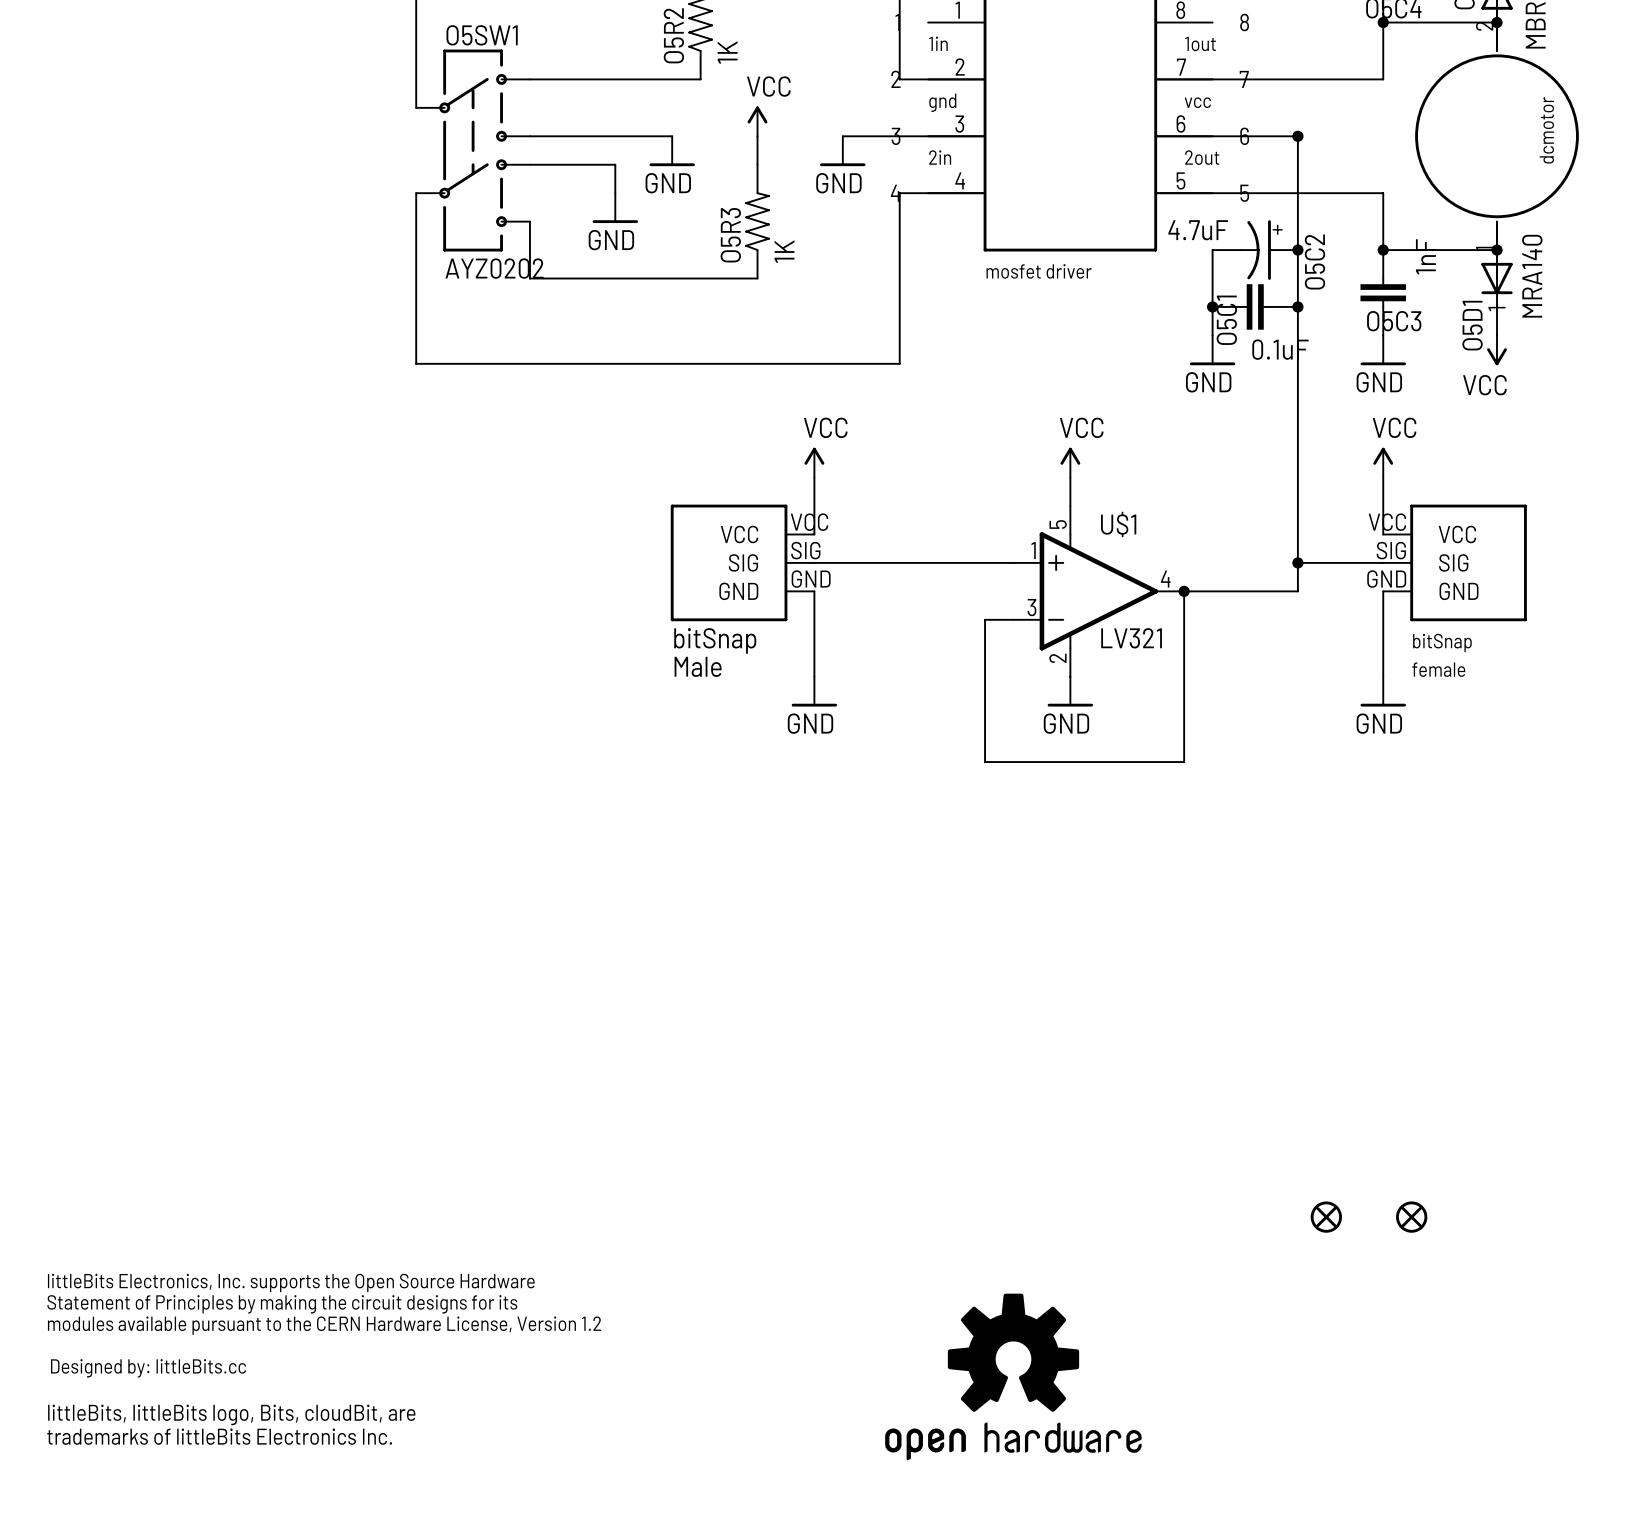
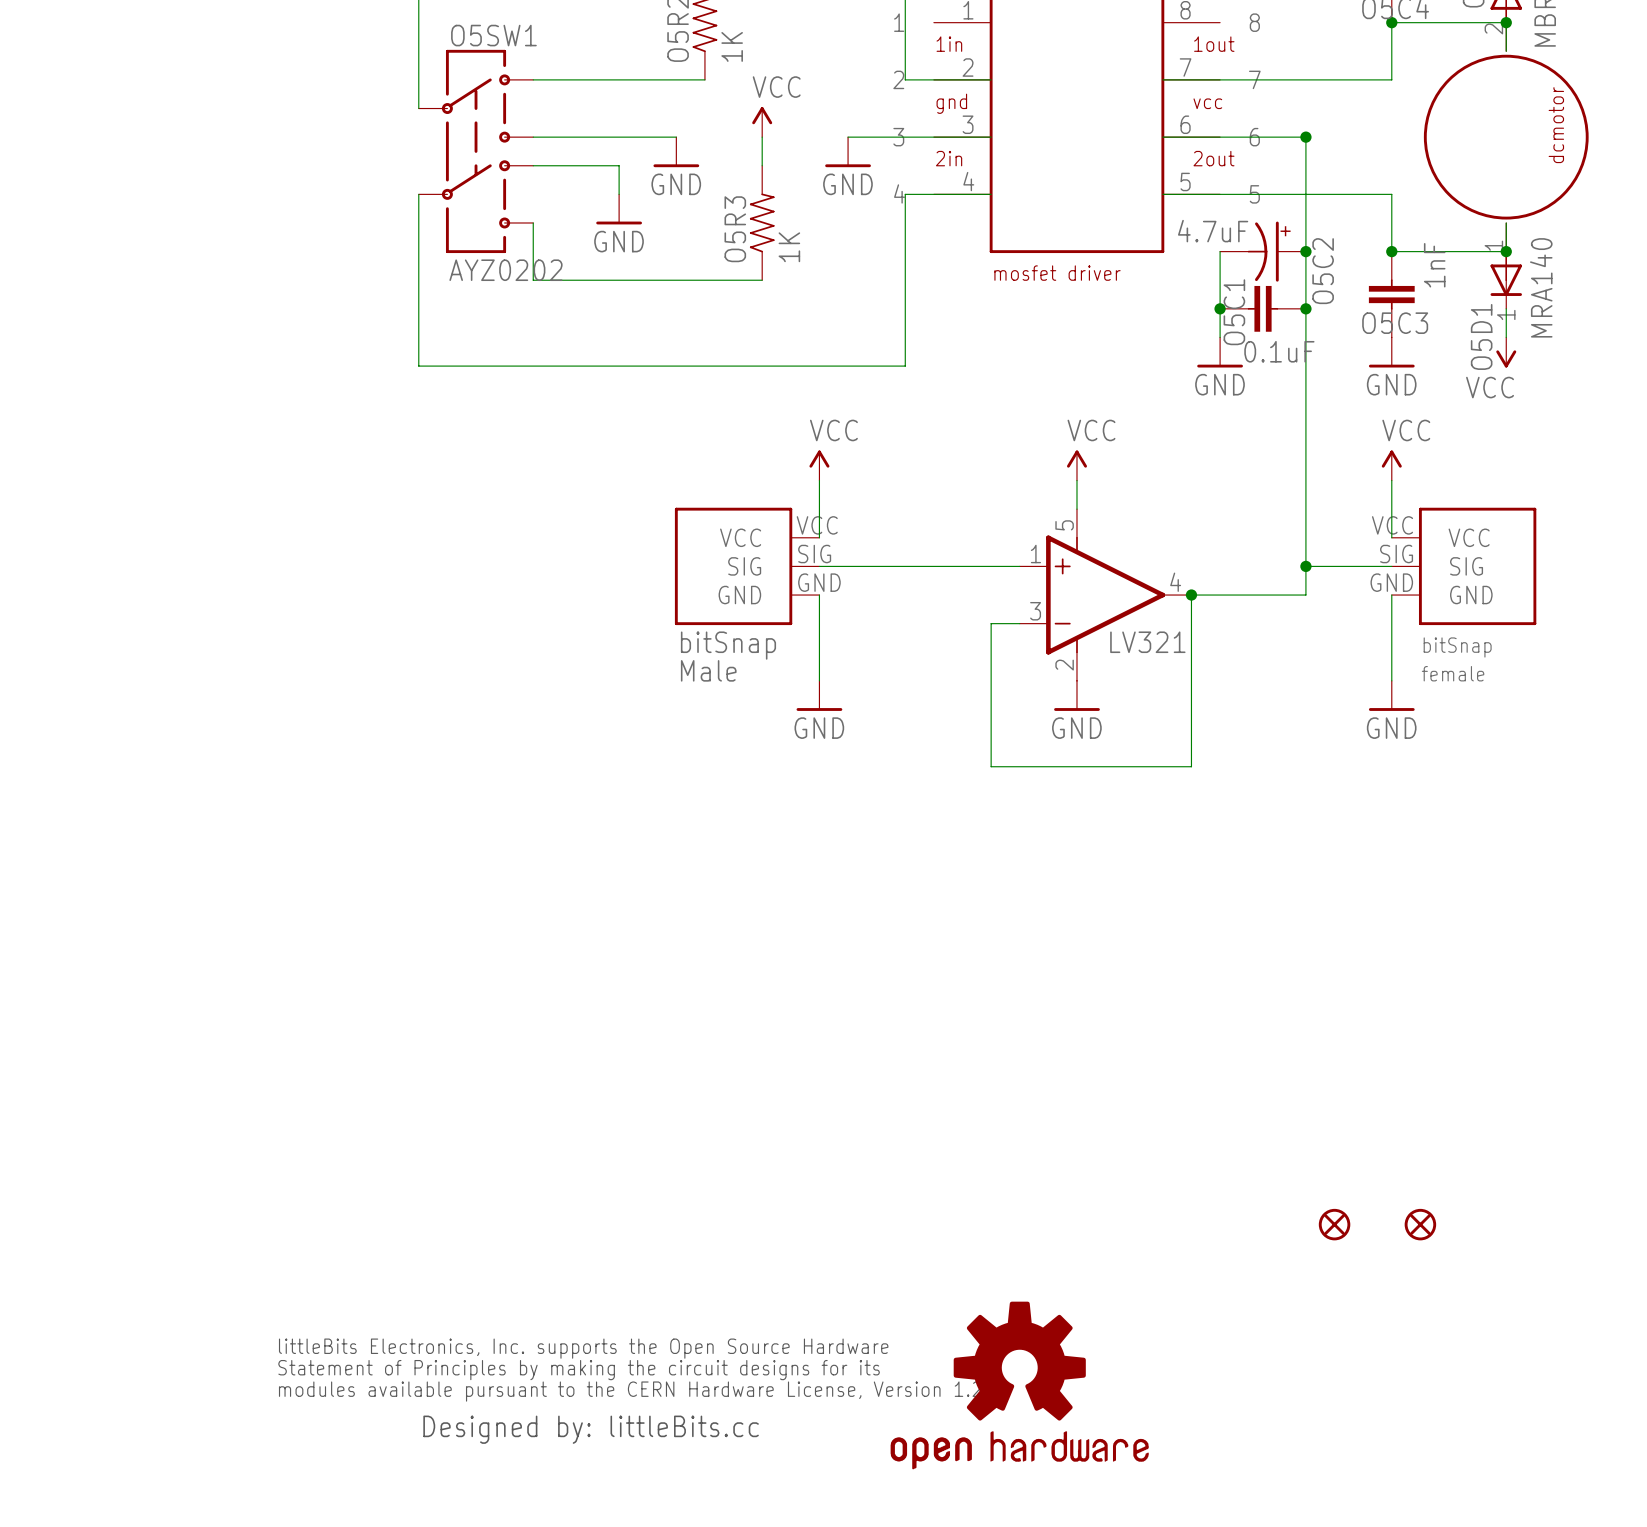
U$1 name: U$1 (1118, 524) -> none
part: (324, 1359) -> none
part: none -> (629, 1391)

